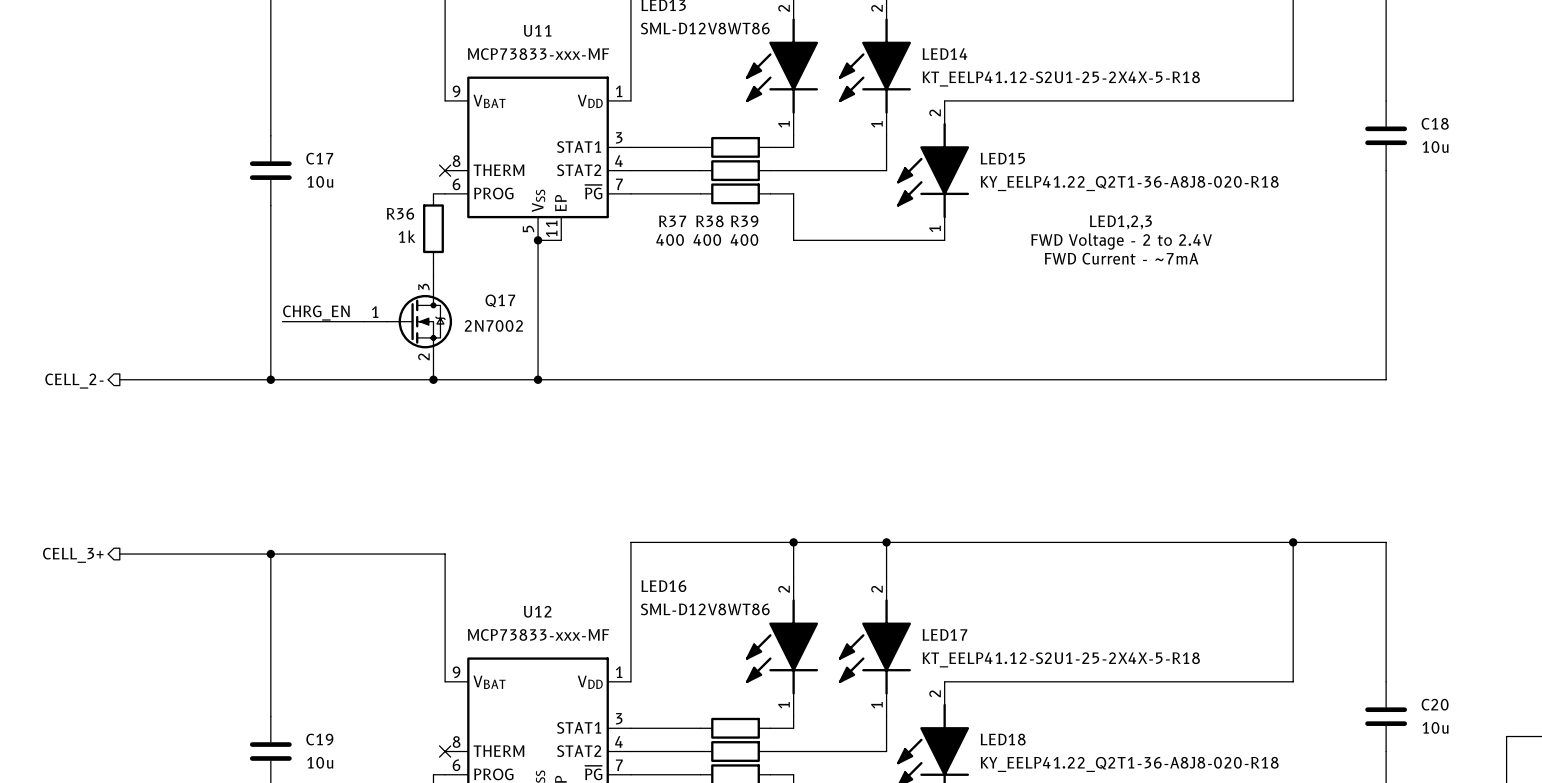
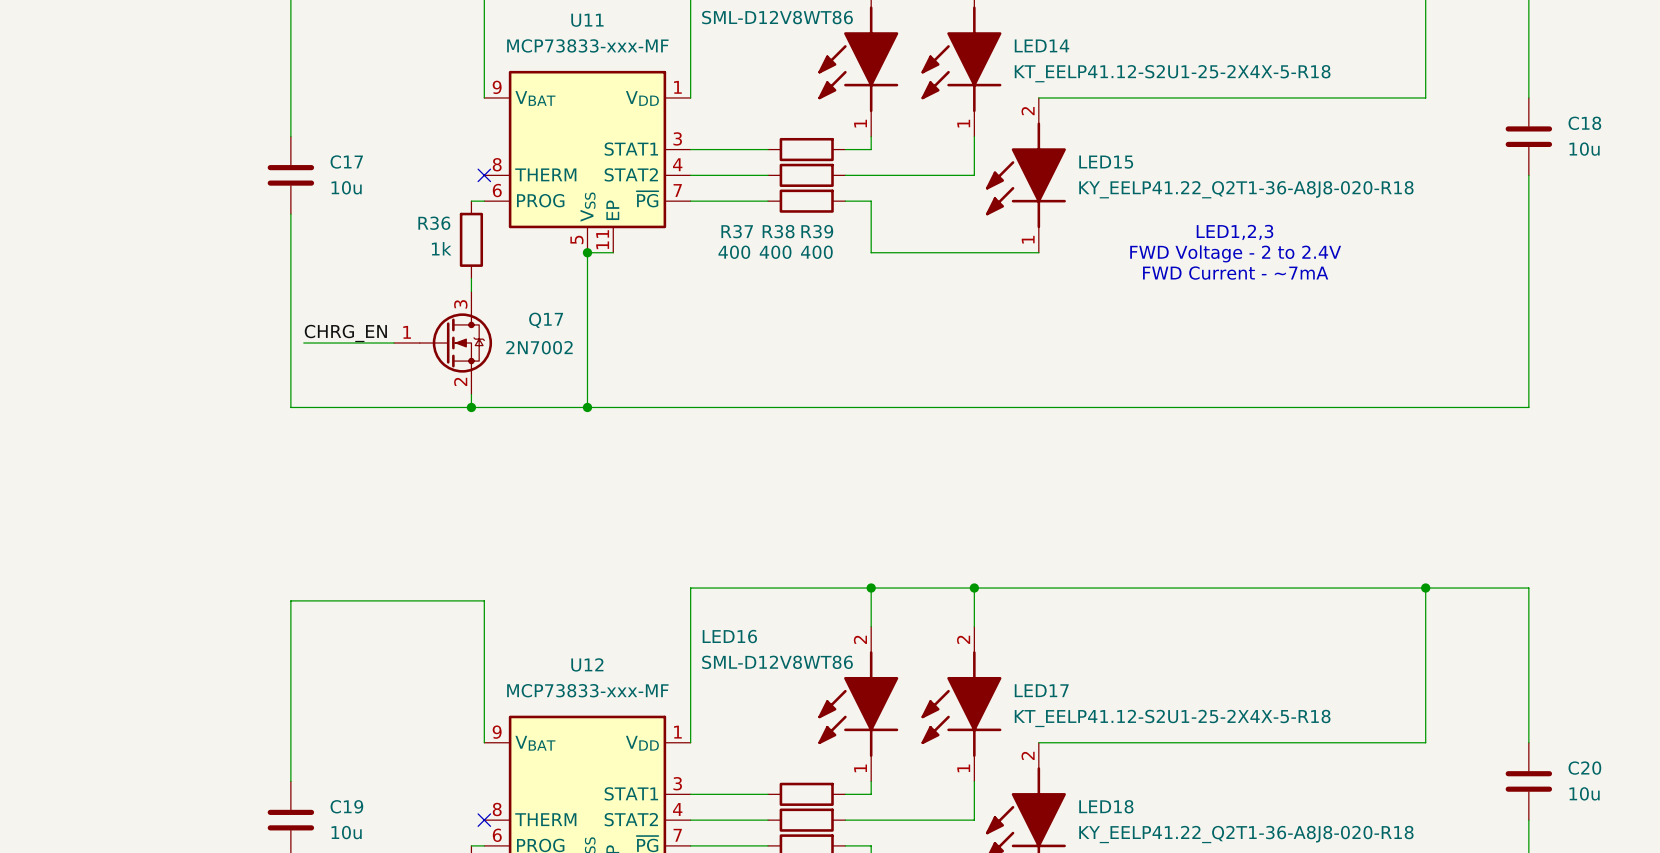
wire: (119, 379) (270, 379) -> none
junction: (270, 379) -> none
hierarchical label: CELL_2- (74, 381) -> none
wire: (119, 554) (270, 554) -> none
junction: (270, 554) -> none
hierarchical label: CELL_3+ (73, 555) -> none

